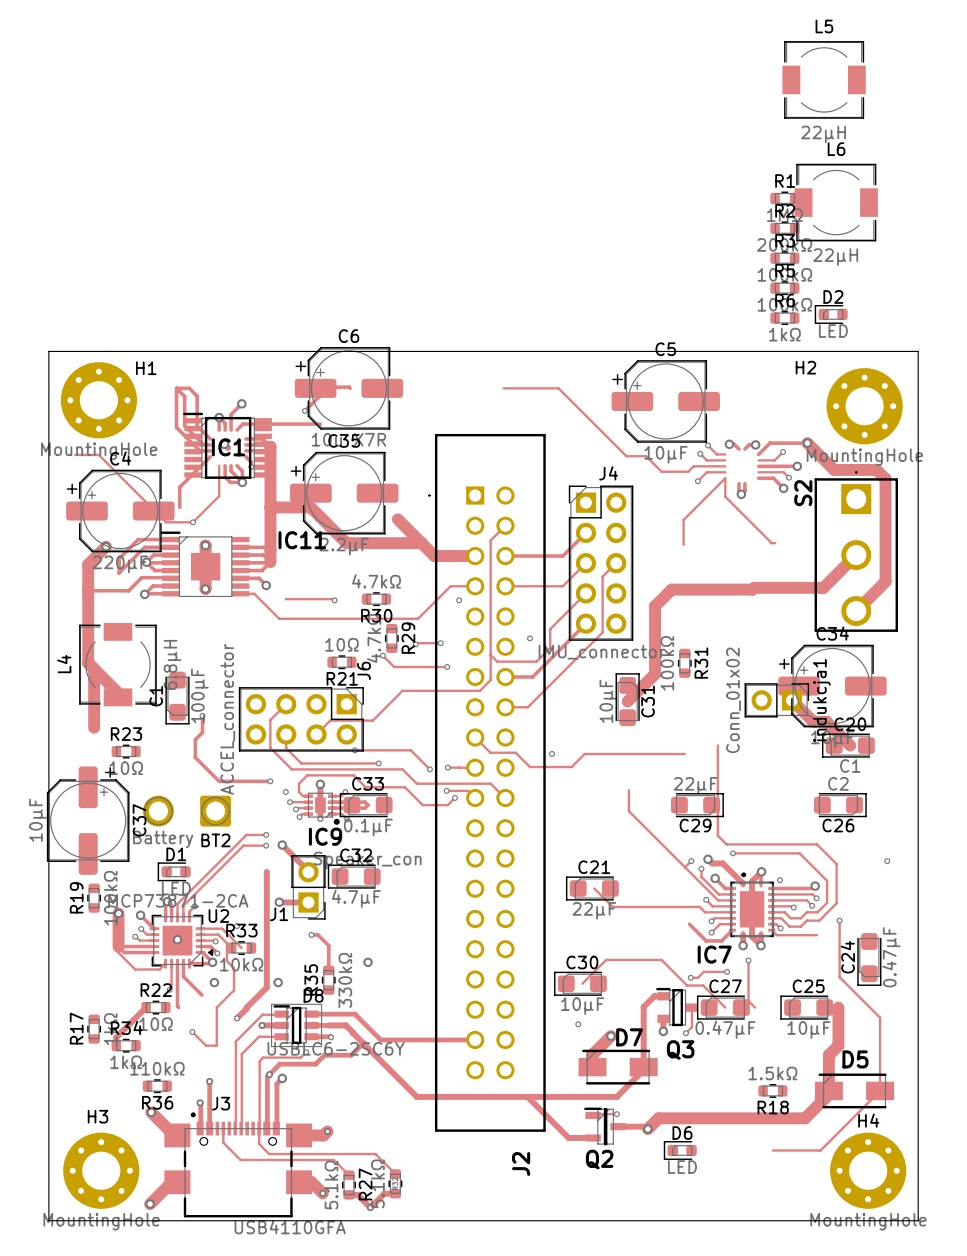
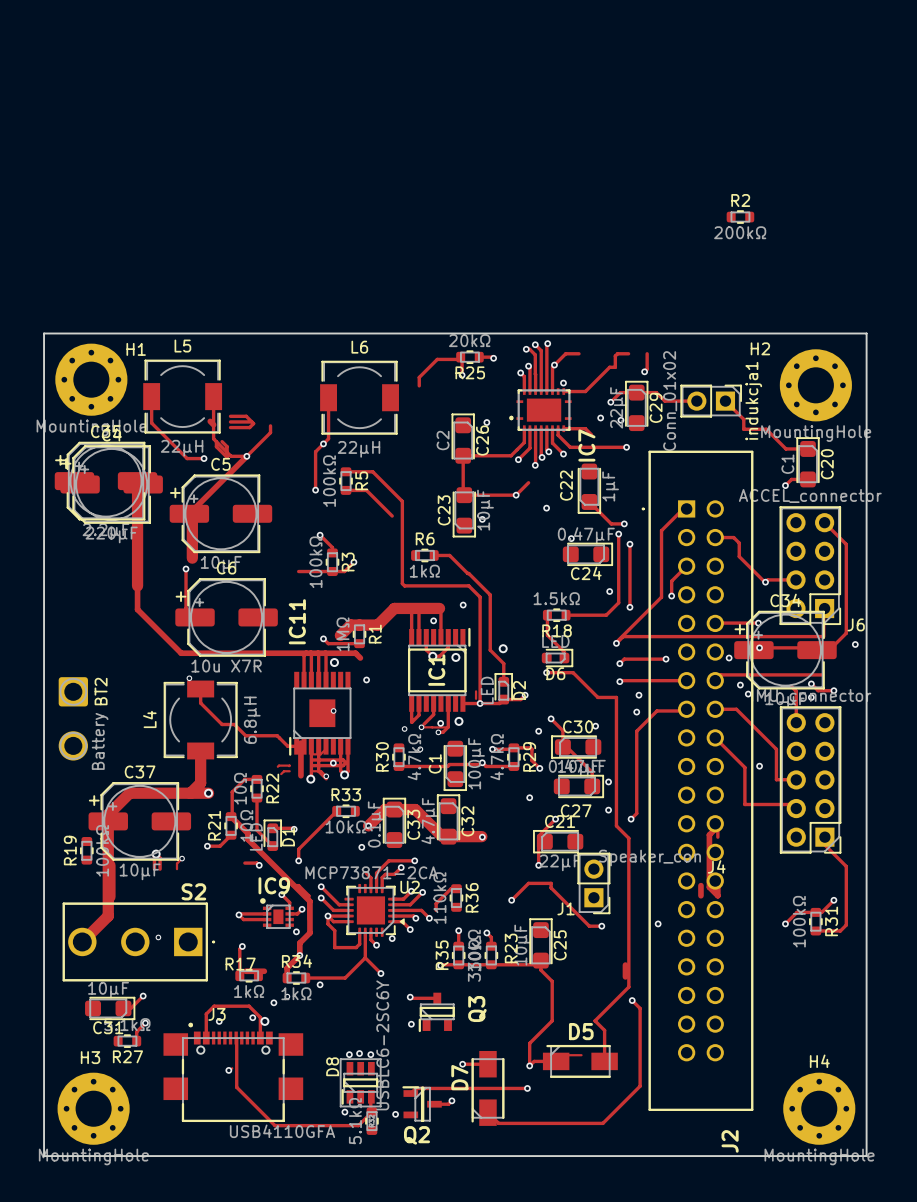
L5 position: (824, 79) -> (182, 396)
R1 rotation: 0° (784, 198) -> 90° clockwise (359, 634)
R1 position: (784, 198) -> (359, 634)
L6 position: (836, 202) -> (359, 397)
R3 rotation: 0° (784, 258) -> 90° clockwise (332, 562)
R3 position: (784, 258) -> (332, 562)
R5 rotation: 0° (784, 288) -> 90° clockwise (346, 481)
R5 position: (784, 288) -> (346, 481)
D2 rotation: 0° (831, 314) -> 90° clockwise (503, 688)
D2 position: (831, 314) -> (503, 688)
R6 position: (784, 318) -> (424, 555)
C6 footprint: [294, 347, 404, 430] -> [175, 578, 278, 657]
C5 footprint: [611, 360, 720, 443] -> [169, 474, 273, 553]
track: none -> (547, 343) (546, 391)
via: none -> (547, 343)
track: none -> (535, 344) (541, 350) (541, 391)
via: none -> (535, 344)
track: none -> (526, 349) (529, 349) (535, 354) (535, 391)
via: none -> (526, 349)
track: none -> (578, 353) (565, 353) (552, 367) (552, 391)
track: none -> (628, 353) (617, 353) (615, 356) (615, 367) (609, 367) (585, 391) (563, 391)
track: none -> (647, 353) (647, 369) (644, 371)
R25: none -> 20kΩ (469, 357)
track: none -> (479, 357) (493, 358)
via: none -> (493, 358)
via: none -> (554, 365)
track: none -> (528, 366) (529, 391)
via: none -> (528, 366)
track: (176, 388) (176, 427) (199, 450) (210, 450) -> none
track: (176, 388) (184, 396) (184, 425) (203, 444) (210, 444) -> none
track: (176, 388) (189, 388) (197, 396) (197, 425) (210, 438) -> none
track: (350, 388) (328, 387) (304, 410) -> none
track: (503, 388) (558, 388) (626, 456) (646, 456) (661, 471) -> (558, 428) (558, 435) (570, 447) (623, 447)
via: none -> (644, 371)
track: none -> (520, 372) (524, 376) (524, 391)
via: none -> (520, 372)
track: none -> (462, 375) (460, 357) (458, 359) (437, 359) (419, 377) (419, 385)
via: none -> (462, 375)
track: (241, 403) (231, 414) (231, 430) -> none
via: (241, 403) -> none
via: none -> (563, 383)
via: (304, 410) -> none
via: (219, 417) -> none
track: none -> (151, 396) (151, 423) (187, 458) (203, 458)
track: none -> (213, 396) (213, 438) (231, 456) (246, 456)
track: none -> (328, 397) (328, 438) (315, 451) (315, 490)
track: none -> (725, 401) (743, 419) (743, 429) (766, 429) (786, 448) (808, 448)
track: (320, 424) (242, 424) (237, 430) -> none
track: none -> (610, 402) (620, 392) (656, 392) (664, 401) (696, 401) (691, 406)
via: none -> (610, 402)
track: (219, 430) (219, 417) (225, 423) (225, 430) -> none
via: none -> (600, 418)
via: none -> (620, 420)
via: (807, 443) -> none
via: (224, 444) -> none
track: (729, 444) (734, 444) (738, 449) -> none
via: (729, 444) -> none
track: (755, 444) (749, 444) (744, 449) -> none
via: (755, 444) -> none
IC1 rotation: 0° (227, 445) -> 90° clockwise (439, 669)
IC1 position: (227, 445) -> (439, 669)
via: none -> (486, 422)
track: (708, 445) (716, 454) (725, 454) -> none
via: (708, 445) -> none
track: (270, 446) (270, 562) -> none
track: none -> (270, 425) (270, 432) (246, 456)
C35 footprint: [290, 451, 399, 535] -> [54, 442, 158, 521]
track: none -> (524, 428) (524, 442) (511, 455) (463, 455) (463, 494) (516, 495) (528, 482)
track: none -> (529, 428) (529, 448) (518, 459)
track: none -> (535, 428) (535, 465)
track: none -> (541, 428) (542, 457)
track: none -> (546, 428) (546, 449) (548, 451)
track: none -> (552, 428) (552, 443) (563, 454)
track: none -> (563, 428) (585, 428) (591, 434)
track: (783, 452) (774, 460) (758, 460) -> none
via: (783, 452) -> none
track: (700, 453) (706, 460) (725, 460) -> none
via: (700, 453) -> none
track: (75, 454) (98, 454) (166, 522) (192, 522) (219, 496) (219, 465) -> none
track: (758, 454) (769, 443) (807, 443) (834, 469) (876, 469) (885, 478) (885, 581) (856, 611) -> none
track: (210, 456) (179, 487) (179, 507) -> none
track: (245, 456) (251, 462) (251, 466) -> none
track: (225, 465) (225, 477) (230, 482) (242, 482) -> none
via: (251, 466) -> none
track: (725, 466) (693, 466) (688, 471) (664, 471) -> none
track: (758, 466) (797, 466) -> none
via: (797, 466) -> none
via: none -> (323, 443)
via: none -> (626, 447)
track: (725, 472) (706, 472) (697, 481) -> none
track: (758, 472) (783, 472) (788, 477) -> none
J4 name position: J4 (608, 473) -> J4 (716, 866)
via: none -> (548, 451)
via: (788, 477) -> none
via: none -> (563, 454)
track: (758, 478) (773, 478) (783, 488) -> none
track: none -> (246, 456) (189, 513)
via: none -> (246, 456)
via: (697, 481) -> none
via: (242, 482) -> none
via: none -> (542, 457)
via: none -> (204, 458)
track: (738, 483) (738, 491) (741, 494) (744, 490) (744, 483) -> none
via: none -> (518, 459)
via: (783, 488) -> none
via: none -> (535, 465)
via: (741, 494) -> none
track: none -> (346, 471) (372, 471) (402, 501) (402, 583) (404, 585) (468, 585) (480, 597) (480, 703)
track: none -> (808, 479) (791, 479) (785, 485)
track: none -> (137, 481) (137, 609) (181, 653) (355, 653) (360, 658)
track: (270, 507) (310, 507) (346, 543) (421, 543) -> none
via: none -> (785, 485)
C22: none -> 1µF (589, 488)
via: none -> (315, 490)
track: none -> (346, 490) (366, 490) (392, 516)
track: (397, 519) (434, 556) (475, 556) -> none
via: (192, 522) -> none
via: none -> (516, 495)
track: (505, 525) (490, 540) (490, 680) (479, 690) (402, 690) (372, 720) (330, 720) (316, 734) -> none
track: none -> (589, 501) (611, 523) (624, 523)
IC11 footprint: [160, 531, 250, 598] -> [289, 671, 352, 756]
track: (585, 532) (562, 556) (505, 556) -> none
via: none -> (546, 508)
track: none -> (685, 510) (686, 508) (683, 508) (661, 530) (661, 597) (616, 643) (623, 636) (822, 636)
track: (170, 539) (138, 539) (119, 558) (119, 572) (144, 547) (170, 547) -> none
IC11 name position: IC11 (302, 540) -> IC11 (297, 621)
C23: none -> 10µF (464, 512)
track: (775, 543) (771, 543) (725, 496) (725, 478) (683, 519) (683, 544) -> none
via: (205, 545) -> none
track: (106, 546) (88, 564) (88, 662) (119, 693) -> none
via: (106, 546) -> none
track: (240, 547) (267, 547) (270, 550) -> none
via: none -> (482, 519)
S2 rotation: 0° (856, 551) -> 90° clockwise (138, 941)
S2 position: (856, 551) -> (138, 941)
track: none -> (824, 522) (846, 544) (846, 633) (831, 647) (759, 647)
via: none -> (624, 523)
track: (170, 555) (153, 555) (146, 562) (154, 570) (170, 570) -> none
track: (240, 555) (263, 555) (270, 562) -> none
track: (856, 555) (823, 587) (671, 589) (655, 606) (655, 674) (627, 701) -> none
via: (146, 562) -> none
track: (147, 562) (170, 562) -> none
track: (240, 562) (269, 562) -> none
track: (270, 562) (262, 570) (240, 570) -> none
track: (585, 563) (562, 586) (505, 586) -> none
J4 rotation: 0° (601, 563) -> 180° (810, 779)
J4 position: (601, 563) -> (810, 779)
track: (616, 563) (602, 576) -> none
track: none -> (618, 534) (618, 602) (606, 615) (566, 615)
via: none -> (618, 534)
track: none -> (320, 535) (332, 547) (332, 552)
via: none -> (320, 535)
track: none -> (715, 537) (733, 537) (739, 543) (739, 556) (765, 582) (767, 579) (796, 579)
via: none -> (571, 538)
track: none -> (629, 544) (629, 607)
via: none -> (629, 544)
track: (602, 576) (602, 632) (527, 707) (505, 707) -> none
track: (170, 578) (141, 577) (128, 590) (88, 590) -> none
track: (240, 578) (259, 578) (266, 585) -> none
via: (266, 585) -> none
track: (170, 586) (153, 586) (144, 594) -> none
track: none -> (434, 555) (449, 555) (490, 594) (490, 650) (503, 663) (503, 681)
track: (475, 586) (450, 586) (418, 618) (279, 618) (254, 593) (240, 593) -> none
via: (205, 589) -> none
track: (145, 593) (170, 593) -> none
track: none -> (353, 562) (344, 571) (298, 571)
via: none -> (353, 562)
track: (585, 593) (550, 629) (550, 647) (536, 661) (497, 661) (490, 655) -> none
via: (144, 594) -> none
track: none -> (686, 566) (671, 581) (671, 596)
track: (285, 599) (334, 600) -> none
R30 rotation: 0° (376, 599) -> 90° clockwise (398, 757)
R30 position: (376, 599) -> (398, 757)
track: none -> (186, 568) (186, 608) (195, 617)
via: none -> (186, 568)
via: (334, 600) -> none
via: (459, 600) -> none
via: none -> (765, 582)
track: (585, 623) (532, 677) (505, 677) -> none
via: none -> (609, 591)
via: none -> (671, 596)
R29 position: (391, 638) -> (513, 757)
via: none -> (463, 605)
via: (529, 638) -> none
via: none -> (629, 607)
track: none -> (411, 608) (411, 637)
track: none -> (421, 608) (418, 610) (418, 637)
via: (440, 643) -> none
via: (415, 644) -> none
track: none -> (547, 615) (547, 635) (564, 652) (564, 658)
track: (382, 655) (394, 667) (447, 667) -> none
via: (382, 655) -> none
via: none -> (433, 620)
track: none -> (758, 623) (715, 623)
via: none -> (758, 623)
R21 rotation: 0° (341, 662) -> 90° clockwise (231, 825)
R21 position: (341, 662) -> (231, 825)
R31 position: (684, 663) -> (815, 921)
L4 position: (117, 664) -> (200, 719)
via: (447, 667) -> none
track: (94, 668) (94, 727) -> none
track: none -> (340, 635) (350, 625) (377, 625) (394, 608) (439, 608) (440, 637)
track: none -> (426, 637) (426, 649) (432, 656) (439, 656) (448, 647) (448, 637)
track: none -> (323, 638) (328, 643) (359, 643)
via: none -> (323, 638)
via: none -> (616, 643)
via: none -> (855, 644)
via: none -> (759, 647)
via: none -> (503, 648)
track: none -> (306, 653) (304, 655) (304, 680)
track: none -> (310, 653) (311, 680)
track: none -> (318, 653) (318, 680)
track: none -> (325, 653) (326, 680)
via: none -> (432, 656)
via: none -> (455, 657)
via: none -> (729, 658)
track: none -> (666, 659) (624, 659) (619, 663)
via: none -> (666, 659)
C1 position: (177, 698) -> (455, 765)
via: none -> (334, 662)
C31 rotation: 0° (627, 699) -> 90° clockwise (110, 1008)
C31 position: (627, 699) -> (110, 1008)
via: none -> (619, 663)
indukcja1 position: (776, 700) -> (711, 401)
track: (791, 700) (813, 721) (826, 721) (850, 745) -> none
track: (286, 704) (270, 720) (270, 747) (291, 769) (402, 769) (416, 783) (490, 783) (505, 798) -> none
track: none -> (546, 672) (573, 672) (597, 697) (616, 697) (616, 825) (628, 838) (628, 987) (595, 1020) (604, 1030) (604, 1061)
via: none -> (546, 672)
track: none -> (822, 674) (721, 674) (715, 680)
track: (202, 715) (202, 732) (195, 739) (195, 757) (219, 781) (270, 781) -> none
via: none -> (366, 679)
track: none -> (686, 680) (619, 681)
J6 rotation: 0° (301, 719) -> 90° clockwise (810, 565)
J6 position: (301, 719) -> (810, 565)
via: none -> (619, 681)
track: none -> (811, 683) (818, 690) (833, 690)
via: none -> (811, 683)
via: none -> (740, 685)
track: none -> (791, 686) (796, 691) (796, 722)
track: none -> (200, 689) (200, 703) (222, 724) (234, 724) (245, 735) (277, 735) (287, 746) (296, 746)
via: none -> (833, 690)
via: none -> (748, 694)
track: none -> (525, 695) (520, 699) (503, 699) (499, 703) (462, 703)
via: none -> (525, 695)
via: none -> (638, 695)
track: (286, 734) (286, 748) (301, 763) (378, 763) -> none
via: none -> (811, 697)
track: (475, 737) (490, 752) (515, 752) (529, 767) (571, 767) (584, 754) (684, 754) -> none
track: none -> (411, 703) (411, 722) (418, 715) (418, 703)
track: none -> (433, 703) (433, 714) (424, 724)
track: none -> (448, 703) (448, 727) (442, 732) (438, 732)
via: none -> (480, 703)
track: (717, 745) (717, 835) (726, 844) (816, 844) (836, 864) (836, 903) (819, 920) (806, 920) (800, 926) (789, 926) (781, 918) (771, 918) -> none
C20 rotation: 0° (848, 745) -> 90° clockwise (808, 462)
C20 position: (848, 745) -> (808, 462)
track: none -> (686, 709) (684, 710) (657, 710) (636, 731) (636, 813) (631, 819)
track: none -> (715, 709) (736, 709) (776, 749) (776, 779) (796, 779)
track: (354, 750) (410, 750) (429, 769) -> none
R23 rotation: 0° (126, 751) -> 90° clockwise (491, 955)
R23 position: (126, 751) -> (491, 955)
via: none -> (636, 712)
via: (552, 753) -> none
track: none -> (551, 718) (562, 730) (562, 747) (566, 747) (592, 772) (592, 786)
via: none -> (551, 718)
via: none -> (458, 721)
via: (378, 763) -> none
via: none -> (440, 723)
via: none -> (595, 726)
via: none -> (538, 731)
track: none -> (715, 737) (744, 767) (744, 804) (792, 804) (796, 808)
via: (270, 781) -> none
J2 position: (486, 782) -> (697, 780)
via: (320, 784) -> none
track: none -> (311, 746) (310, 779)
track: none -> (318, 746) (318, 771) (326, 778)
track: none -> (340, 746) (340, 770) (344, 774) (347, 771) (347, 746)
track: (446, 790) (468, 790) (475, 798) -> none
track: none -> (492, 749) (530, 747) (531, 760) (539, 768)
via: none -> (492, 749)
track: (628, 790) (628, 811) (718, 900) (732, 900) -> none
track: none -> (200, 750) (200, 783) (190, 793)
via: (285, 792) -> none
via: (345, 792) -> none
track: (308, 796) (303, 796) (298, 792) (298, 783) (307, 775) (353, 775) (365, 787) (404, 787) (422, 805) (447, 805) (454, 798) -> none
via position: (454, 798) -> (438, 732)
track: (290, 802) (308, 802) -> none
via: (290, 802) -> none
via: none -> (333, 763)
C33 rotation: 0° (366, 805) -> 90° clockwise (394, 822)
C33 position: (366, 805) -> (394, 822)
via: none -> (482, 762)
C29 rotation: 0° (697, 805) -> 90° counterclockwise (636, 406)
C29 position: (697, 805) -> (636, 406)
C26 rotation: 0° (840, 805) -> 90° counterclockwise (463, 438)
C26 position: (840, 805) -> (463, 438)
IC9 rotation: 0° (321, 808) -> 180° (277, 913)
IC9 position: (321, 808) -> (277, 913)
via: none -> (759, 766)
via: (295, 809) -> none
track: none -> (398, 766) (447, 766) (449, 764) (480, 764) (482, 762) (486, 766) (513, 766)
BT2 rotation: 0° (187, 811) -> 90° counterclockwise (73, 718)
BT2 position: (187, 811) -> (73, 718)
via: none -> (539, 768)
via: (299, 817) -> none
via: none -> (344, 774)
via: (320, 818) -> none
C37 rotation: 0° (88, 820) -> 90° counterclockwise (139, 821)
C37 position: (88, 820) -> (139, 821)
track: none -> (257, 779) (244, 779) (232, 792) (231, 816) (247, 833) (247, 839) (309, 901) (309, 932) (299, 943) (299, 955) (287, 968) (287, 978)
via: none -> (310, 779)
via: none -> (608, 781)
track: (266, 834) (246, 834) (177, 903) (177, 917) -> none
via: (266, 834) -> none
track: none -> (208, 793) (129, 793) (108, 814) (108, 916) (82, 941)
via: none -> (208, 793)
track: none -> (257, 798) (257, 830) (272, 846)
via: none -> (529, 797)
track: (266, 845) (243, 845) (183, 905) (183, 917) -> none
via: (266, 845) -> none
track: (282, 845) (308, 872) -> none
via: (282, 845) -> none
track: (733, 853) (799, 853) (827, 880) (827, 902) (817, 912) (806, 912) (800, 918) (790, 918) (784, 912) (771, 912) -> none
via: (733, 853) -> none
via: none -> (608, 810)
track: none -> (336, 811) (298, 849) (298, 860)
track: (708, 859) (712, 863) (722, 863) (743, 883) -> none
via: (708, 859) -> none
track: (691, 861) (685, 867) -> none
via: (691, 861) -> none
via: (887, 861) -> none
track: none -> (555, 819) (538, 836) (538, 865)
via: none -> (555, 819)
via: none -> (631, 819)
track: (701, 868) (701, 877) (718, 894) (732, 894) -> none
via: (701, 868) -> none
D1 rotation: 0° (174, 871) -> 90° clockwise (272, 835)
D1 position: (174, 871) -> (272, 835)
track: (266, 871) (266, 987) (237, 1018) -> none
track: none -> (368, 825) (384, 809) (415, 809) (442, 836) (482, 837)
via: none -> (368, 825)
via: (761, 871) -> none
track: none -> (272, 828) (294, 829)
via: none -> (294, 829)
C32 rotation: 0° (354, 876) -> 90° clockwise (448, 819)
C32 position: (354, 876) -> (448, 819)
track: (715, 878) (725, 888) (732, 888) -> none
via: (715, 878) -> none
via: (780, 880) -> none
track: none -> (231, 835) (220, 846) (207, 846)
via: none -> (482, 837)
track: none -> (824, 837) (824, 845) (846, 866) (846, 925) (840, 930) (815, 930)
track: (815, 886) (812, 888) (771, 888) -> none
via: (815, 886) -> none
J1 position: (308, 887) -> (593, 883)
track: (594, 888) (612, 906) (699, 906) (705, 912) (732, 912) -> none
via: none -> (207, 846)
via: none -> (361, 847)
track: (771, 894) (812, 894) (816, 898) -> none
via: (816, 898) -> none
track: (706, 899) (712, 906) (732, 906) -> none
via: (706, 899) -> none
track: (771, 900) (806, 900) (812, 905) -> none
track: (279, 902) (308, 902) -> none
via: (279, 902) -> none
IC7 rotation: 0° (752, 905) -> 90° counterclockwise (540, 410)
IC7 position: (752, 905) -> (540, 410)
via: (812, 905) -> none
track: (771, 906) (793, 907) -> none
via: (793, 907) -> none
via: none -> (298, 860)
track: none -> (414, 860) (388, 860) (376, 873) (376, 888)
via: none -> (414, 860)
track: none -> (244, 863) (257, 863) (259, 865)
via: (118, 913) -> none
via: none -> (259, 865)
via: none -> (538, 865)
track: (140, 915) (154, 928) -> none
via: (140, 915) -> none
track: none -> (401, 867) (394, 874) (385, 874) (382, 877) (382, 888)
via: none -> (401, 867)
track: (732, 918) (714, 918) (711, 921) -> none
track: (839, 920) (839, 977) (880, 1017) (880, 1090) (820, 1150) (772, 1150) -> none
via: (839, 920) -> none
track: none -> (366, 873) (370, 877) (370, 888)
via: (711, 921) -> none
track: (689, 924) (706, 940) (721, 940) (732, 930) -> none
track: (732, 924) (719, 924) (711, 932) -> none
track: (771, 924) (776, 924) (780, 928) -> none
via: (237, 926) -> none
track: (141, 928) (146, 934) (154, 934) -> none
via: (141, 928) -> none
track: (200, 928) (222, 928) (241, 948) -> none
via: (780, 928) -> none
track: (771, 930) (776, 935) (816, 935) -> none
via: (711, 932) -> none
track: (200, 934) (218, 934) (226, 943) (226, 961) (234, 968) (234, 990) (216, 1007) (216, 1045) -> none
via: (311, 934) -> none
track: (135, 936) (139, 940) (154, 940) -> none
via: (135, 936) -> none
track: none -> (321, 886) (339, 904) (349, 904)
via: none -> (321, 886)
track: none -> (456, 888) (451, 888) (436, 903) (436, 910)
via: (177, 939) -> none
U2 position: (181, 940) -> (374, 910)
track: (200, 940) (215, 941) -> none
track: none -> (411, 891) (403, 899) (392, 899)
via: none -> (411, 891)
via: (215, 941) -> none
track: none -> (422, 892) (410, 904) (392, 904)
via: none -> (422, 892)
track: none -> (281, 894) (289, 902) (289, 908)
via: none -> (281, 894)
via: (743, 945) -> none
via: (761, 945) -> none
track: (118, 946) (118, 952) (135, 969) (159, 969) (165, 963) -> none
track: (118, 946) (124, 952) (154, 952) -> none
track: (154, 946) (118, 946) -> none
track: (200, 946) (210, 946) (217, 953) -> none
R33 position: (241, 948) -> (346, 811)
track: none -> (321, 898) (333, 910) (349, 910)
via: none -> (321, 898)
track: none -> (511, 900) (528, 883) (551, 883) (551, 887) (589, 926) (601, 926)
via: none -> (511, 900)
track: none -> (833, 900) (821, 912) (797, 912) (785, 923)
via: none -> (833, 900)
track: (200, 952) (212, 962) (189, 963) -> none
via: (217, 953) -> none
track: none -> (302, 909) (297, 913) (289, 913)
via: none -> (302, 909)
C24 rotation: 0° (869, 959) -> 90° counterclockwise (587, 554)
C24 position: (869, 959) -> (587, 554)
track: (748, 960) (748, 1001) (755, 1007) -> none
via: (748, 960) -> none
track: none -> (392, 910) (421, 910) (429, 918)
via: (212, 962) -> none
via: (368, 962) -> none
track: (171, 963) (171, 987) (169, 989) -> none
track: (177, 963) (178, 1007) -> none
track: (183, 963) (183, 976) (201, 995) -> none
track: none -> (267, 913) (238, 914) (243, 919) (267, 919)
via: none -> (238, 914)
track: none -> (327, 916) (349, 916)
track: none -> (327, 916) (327, 923) (334, 930) (334, 947) (356, 947) (359, 944) (359, 932)
track: none -> (327, 916) (333, 921) (349, 921)
via: none -> (327, 916)
track: none -> (392, 916) (413, 916) (415, 918)
via: none -> (415, 918)
via: none -> (429, 918)
track: (727, 971) (703, 971) (697, 977) (690, 977) -> none
via: (727, 971) -> none
track: none -> (392, 921) (402, 921) (410, 929)
via: none -> (658, 923)
via: none -> (785, 923)
via: none -> (601, 926)
via: (690, 977) -> none
R35 position: (328, 980) -> (458, 955)
via: none -> (410, 929)
via: (214, 982) -> none
via: (278, 982) -> none
track: none -> (458, 930) (458, 946)
via: none -> (458, 930)
via: none -> (296, 931)
C30 position: (580, 983) -> (576, 747)
track: (582, 983) (606, 959) (661, 959) (687, 985) (703, 985) (725, 1007) -> none
track: none -> (365, 932) (365, 957)
track: none -> (370, 932) (370, 939) (376, 945)
track: none -> (486, 932) (491, 937) (491, 946)
via: none -> (486, 932)
via: none -> (392, 938)
track: (663, 996) (654, 996) (643, 1006) (643, 1070) (616, 1096) (416, 1096) (346, 1025) (311, 1025) -> none
via: none -> (376, 945)
track: none -> (242, 946) (239, 949) (239, 975)
via: none -> (242, 946)
track: (146, 1007) (116, 1037) (116, 1045) -> none
R22 rotation: 0° (155, 1007) -> 90° clockwise (257, 788)
R22 position: (155, 1007) -> (257, 788)
Q3 rotation: 0° (677, 1007) -> 90° counterclockwise (436, 1012)
Q3 position: (677, 1007) -> (436, 1012)
track: (691, 1007) (691, 1027) (685, 1033) -> none
C27 rotation: 0° (723, 1007) -> 180° (578, 786)
C27 position: (723, 1007) -> (578, 786)
C25 rotation: 0° (806, 1007) -> 90° clockwise (540, 943)
C25 position: (806, 1007) -> (540, 943)
track: (838, 1007) (838, 1045) (828, 1055) (828, 1094) (805, 1118) (658, 1118) (647, 1129) (645, 1126) (618, 1126) -> none
via: none -> (299, 955)
track: none -> (365, 957) (380, 973)
track: none -> (365, 957) (345, 978) (305, 978)
track: (281, 1014) (262, 1014) (235, 1041) (235, 1128) -> none
track: (311, 1014) (354, 1014) (380, 1039) (475, 1039) (471, 1043) -> none
via: (237, 1018) -> none
track: none -> (440, 965) (536, 964) (540, 960) (540, 970) (552, 981) (552, 1020) (529, 1043) (529, 1065) (534, 1061) (556, 1061)
via: none -> (440, 965)
via: (578, 1024) -> none
via: (262, 1025) -> none
D8 rotation: 0° (296, 1025) -> 90° counterclockwise (360, 1082)
D8 position: (296, 1025) -> (360, 1082)
via: none -> (380, 973)
R17 rotation: 0° (94, 1029) -> 90° clockwise (249, 975)
R17 position: (94, 1029) -> (249, 975)
via: (663, 1031) -> none
track: (192, 1032) (206, 1045) (216, 1045) -> none
via: (192, 1032) -> none
via: (685, 1033) -> none
track: (281, 1036) (259, 1036) (241, 1054) (241, 1128) -> none
track: (311, 1036) (331, 1037) -> none
track: (610, 1036) (592, 1054) (592, 1067) -> none
via: (610, 1036) -> none
via: (331, 1037) -> none
via: none -> (320, 984)
track: (363, 1043) (351, 1055) (324, 1055) (315, 1064) (279, 1064) (267, 1076) (266, 1128) -> none
R34 position: (126, 1045) -> (296, 978)
track: none -> (143, 996) (130, 1008) (123, 1008)
via: none -> (143, 996)
track: (306, 1052) (300, 1057) (263, 1057) (259, 1061) (259, 1143) (269, 1154) (375, 1154) (395, 1174) -> none
track: none -> (410, 997) (437, 998)
via: none -> (410, 997)
track: none -> (632, 1000) (640, 1008) (640, 1086) (602, 1123) (498, 1123) (487, 1112)
via: none -> (632, 1000)
via: none -> (273, 1002)
D7 rotation: 0° (618, 1067) -> 90° counterclockwise (487, 1088)
D7 position: (618, 1067) -> (487, 1088)
R36 value position: 110kΩ (157, 1068) -> 110kΩ (439, 898)
via: none -> (219, 1021)
track: (282, 1078) (276, 1083) (276, 1128) -> none
track: none -> (145, 1023) (136, 1031) (136, 1041)
via: none -> (145, 1023)
track: (209, 1081) (210, 1128) -> none
via: (209, 1081) -> none
via: none -> (411, 1024)
R36 rotation: 0° (157, 1086) -> 90° clockwise (456, 898)
R36 position: (157, 1086) -> (456, 898)
R18 position: (772, 1090) -> (556, 615)
D5 position: (854, 1090) -> (580, 1061)
track: none -> (206, 1038) (206, 1014) (214, 1006) (249, 1006) (260, 1017) (260, 1038)
track: none -> (236, 1038) (236, 1087) (275, 1125) (358, 1125) (370, 1113) (371, 1097)
track: (527, 1096) (568, 1137) (593, 1137) -> none
R36 name position: R36 (157, 1102) -> R36 (472, 897)
track: (200, 1102) (200, 1128) -> none
via: (200, 1102) -> none
track: (151, 1112) (174, 1135) (177, 1135) -> none
via: (151, 1112) -> none
via: none -> (359, 1053)
via: none -> (349, 1054)
via: none -> (370, 1054)
via: (616, 1114) -> none
track: none -> (462, 1063) (487, 1064)
via: none -> (462, 1064)
via: none -> (529, 1065)
Q2 position: (605, 1126) -> (422, 1104)
track: (223, 1128) (223, 1142) (240, 1160) (333, 1160) (348, 1175) -> none
via: (647, 1129) -> none
via: none -> (228, 1070)
track: (327, 1131) (323, 1135) (299, 1135) -> none
via: (327, 1131) -> none
track: none -> (527, 1088) (415, 1088) (410, 1093)
via: none -> (527, 1088)
D6 rotation: 0° (680, 1150) -> 180° (557, 658)
D6 position: (680, 1150) -> (557, 658)
track: none -> (451, 1100) (448, 1104) (434, 1104)
via: none -> (451, 1100)
J3 position: (238, 1164) -> (233, 1072)
via: none -> (344, 1112)
via: none -> (395, 1114)
track: (177, 1182) (171, 1182) (150, 1204) -> none
track: (299, 1182) (311, 1182) (322, 1193) -> none
R27 rotation: 0° (348, 1185) -> 90° clockwise (127, 1041)
R27 position: (348, 1185) -> (127, 1041)
via: (322, 1193) -> none
track: (395, 1193) (384, 1193) (370, 1207) (357, 1194) (348, 1194) -> none
via: (150, 1204) -> none
via: (370, 1207) -> none

